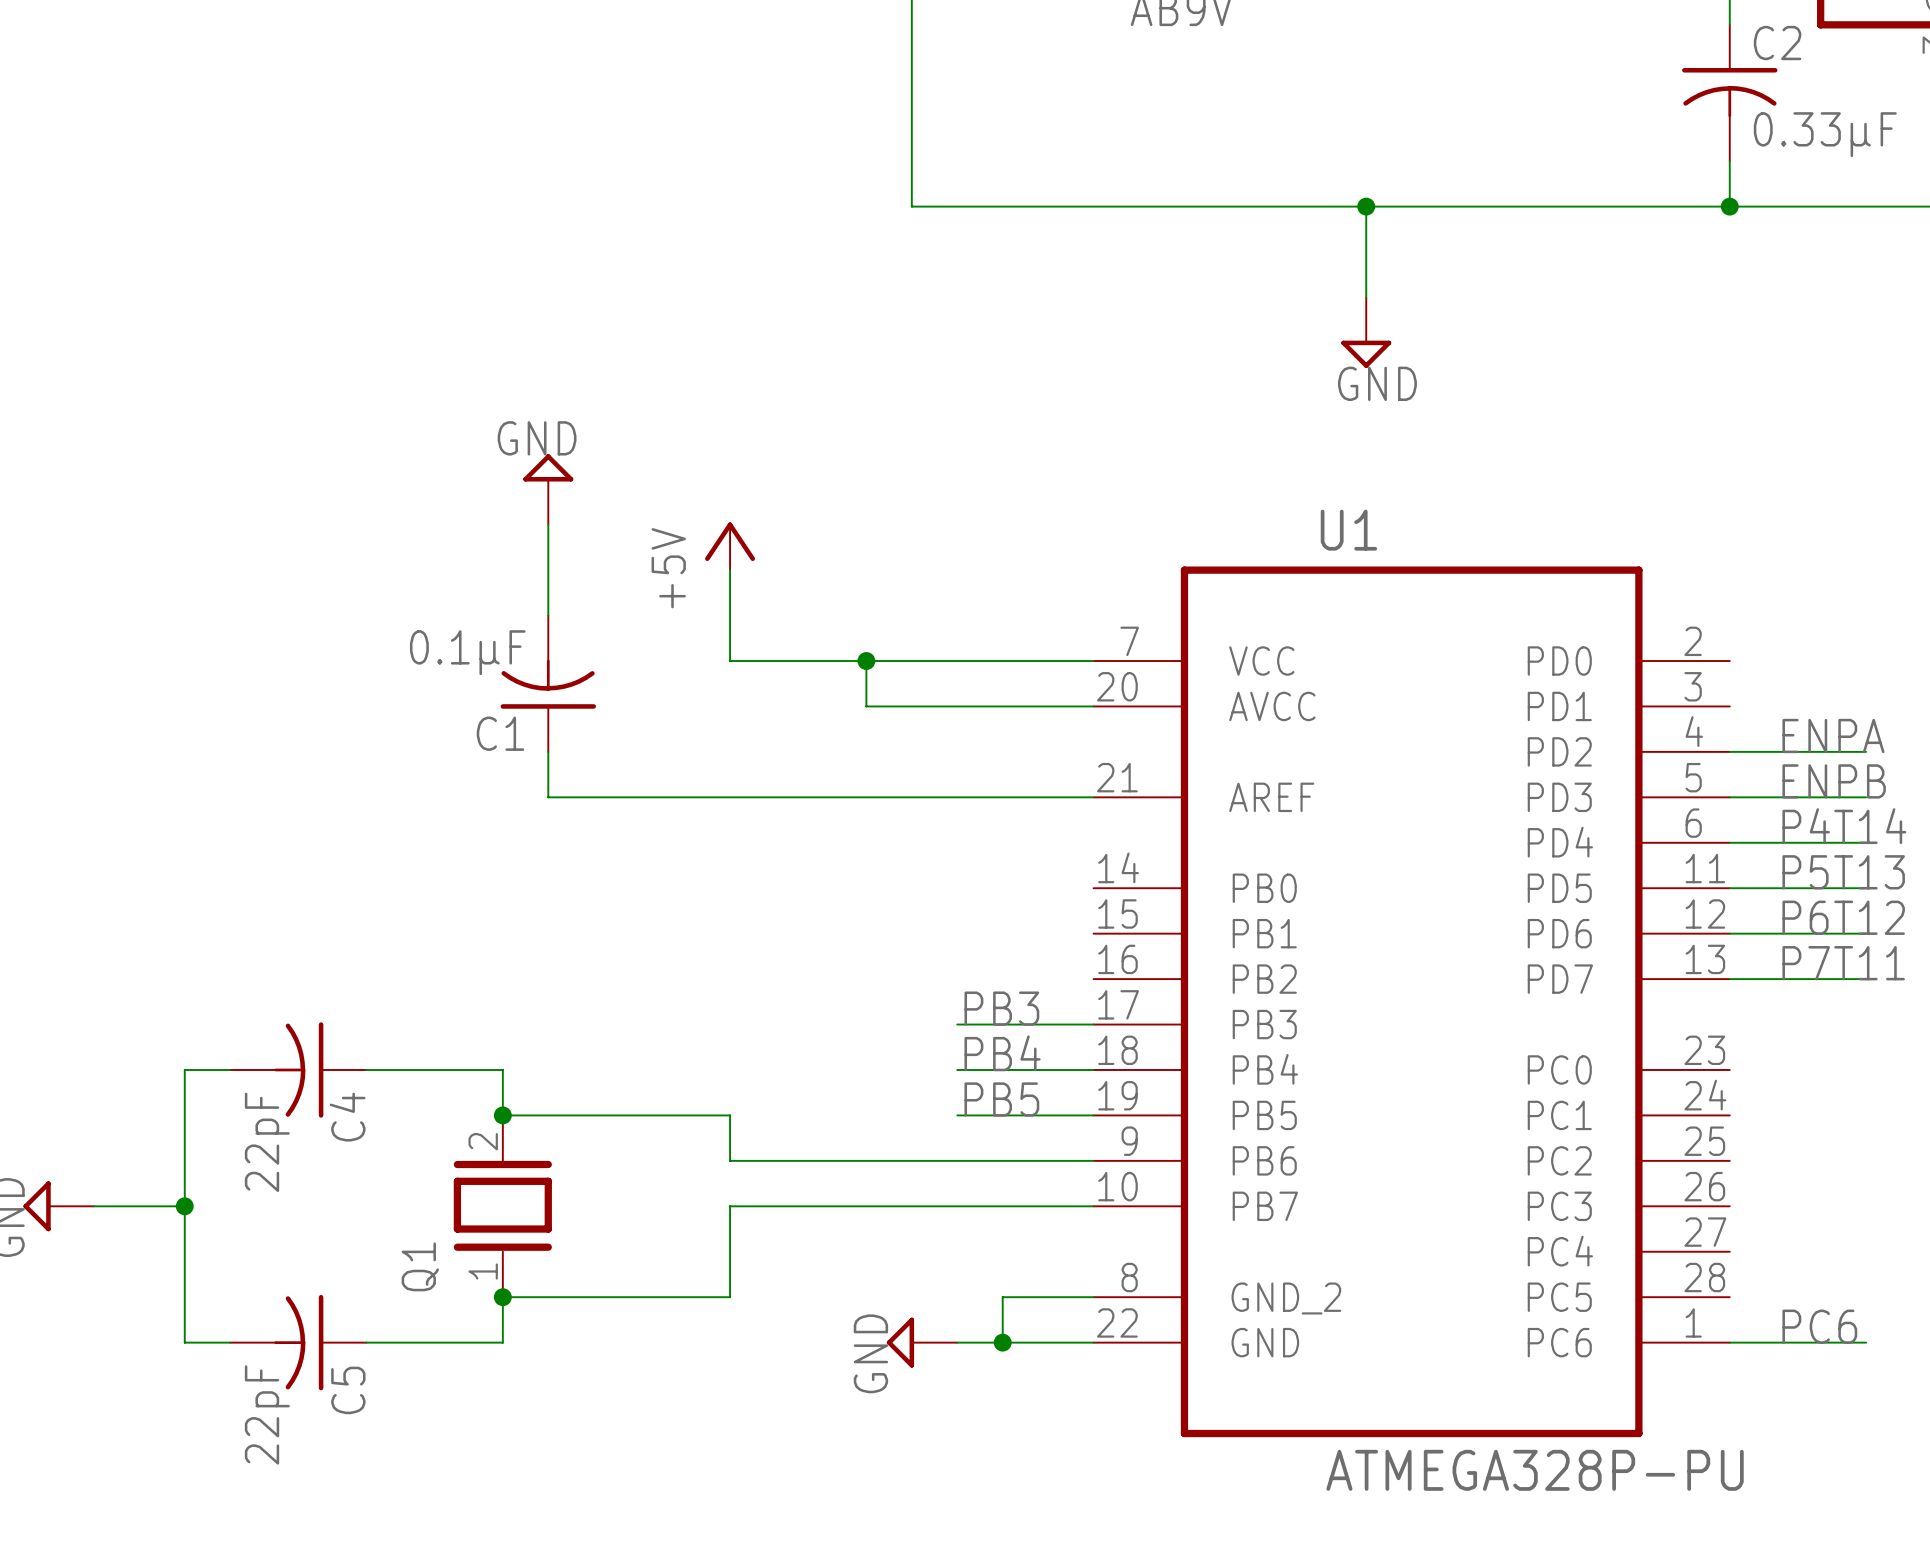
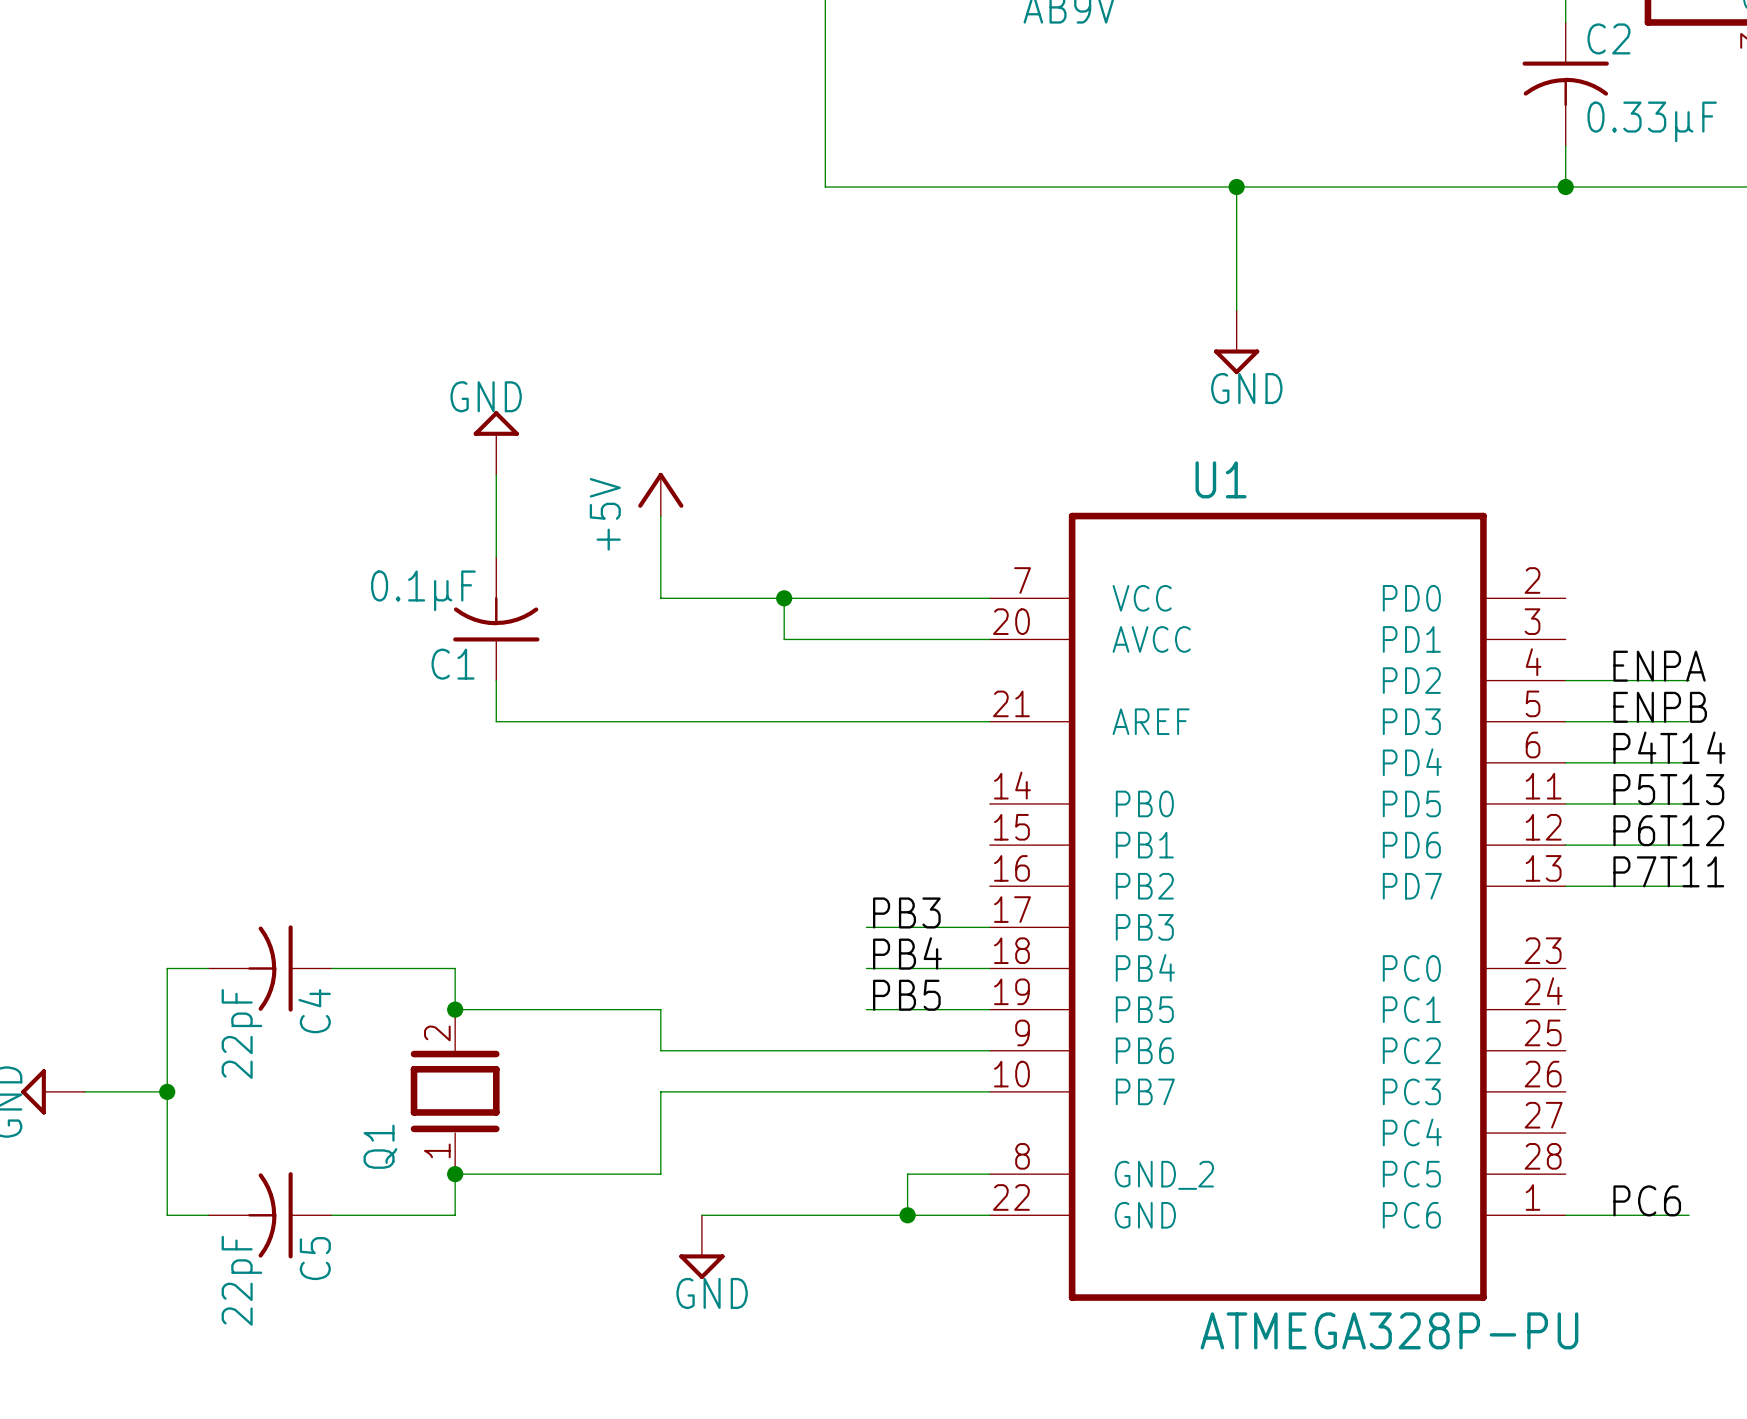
power symbol position: GND (1366, 332) -> GND (1236, 342)
wire: none -> (701, 1215) (866, 1215)
power symbol rotation: 0° (900, 1342) -> 90° counterclockwise (701, 1266)
power symbol position: GND (922, 1342) -> GND (701, 1247)

